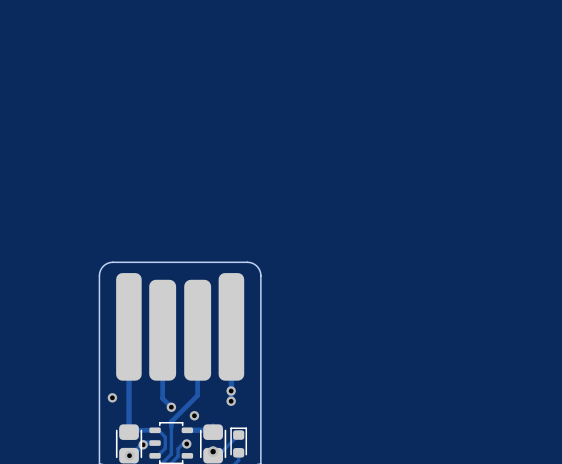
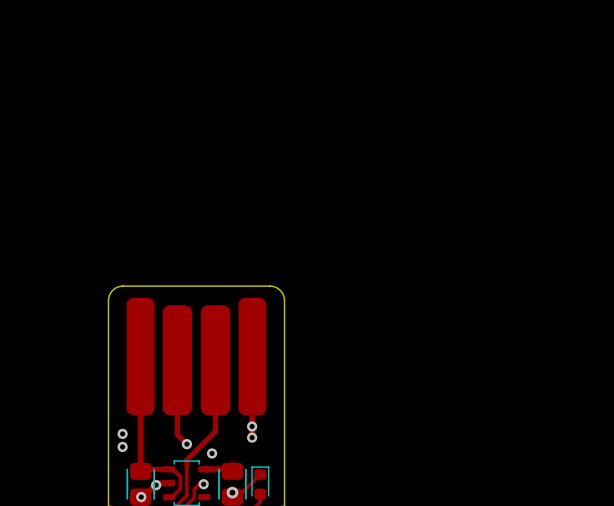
via: none -> (122, 446)

